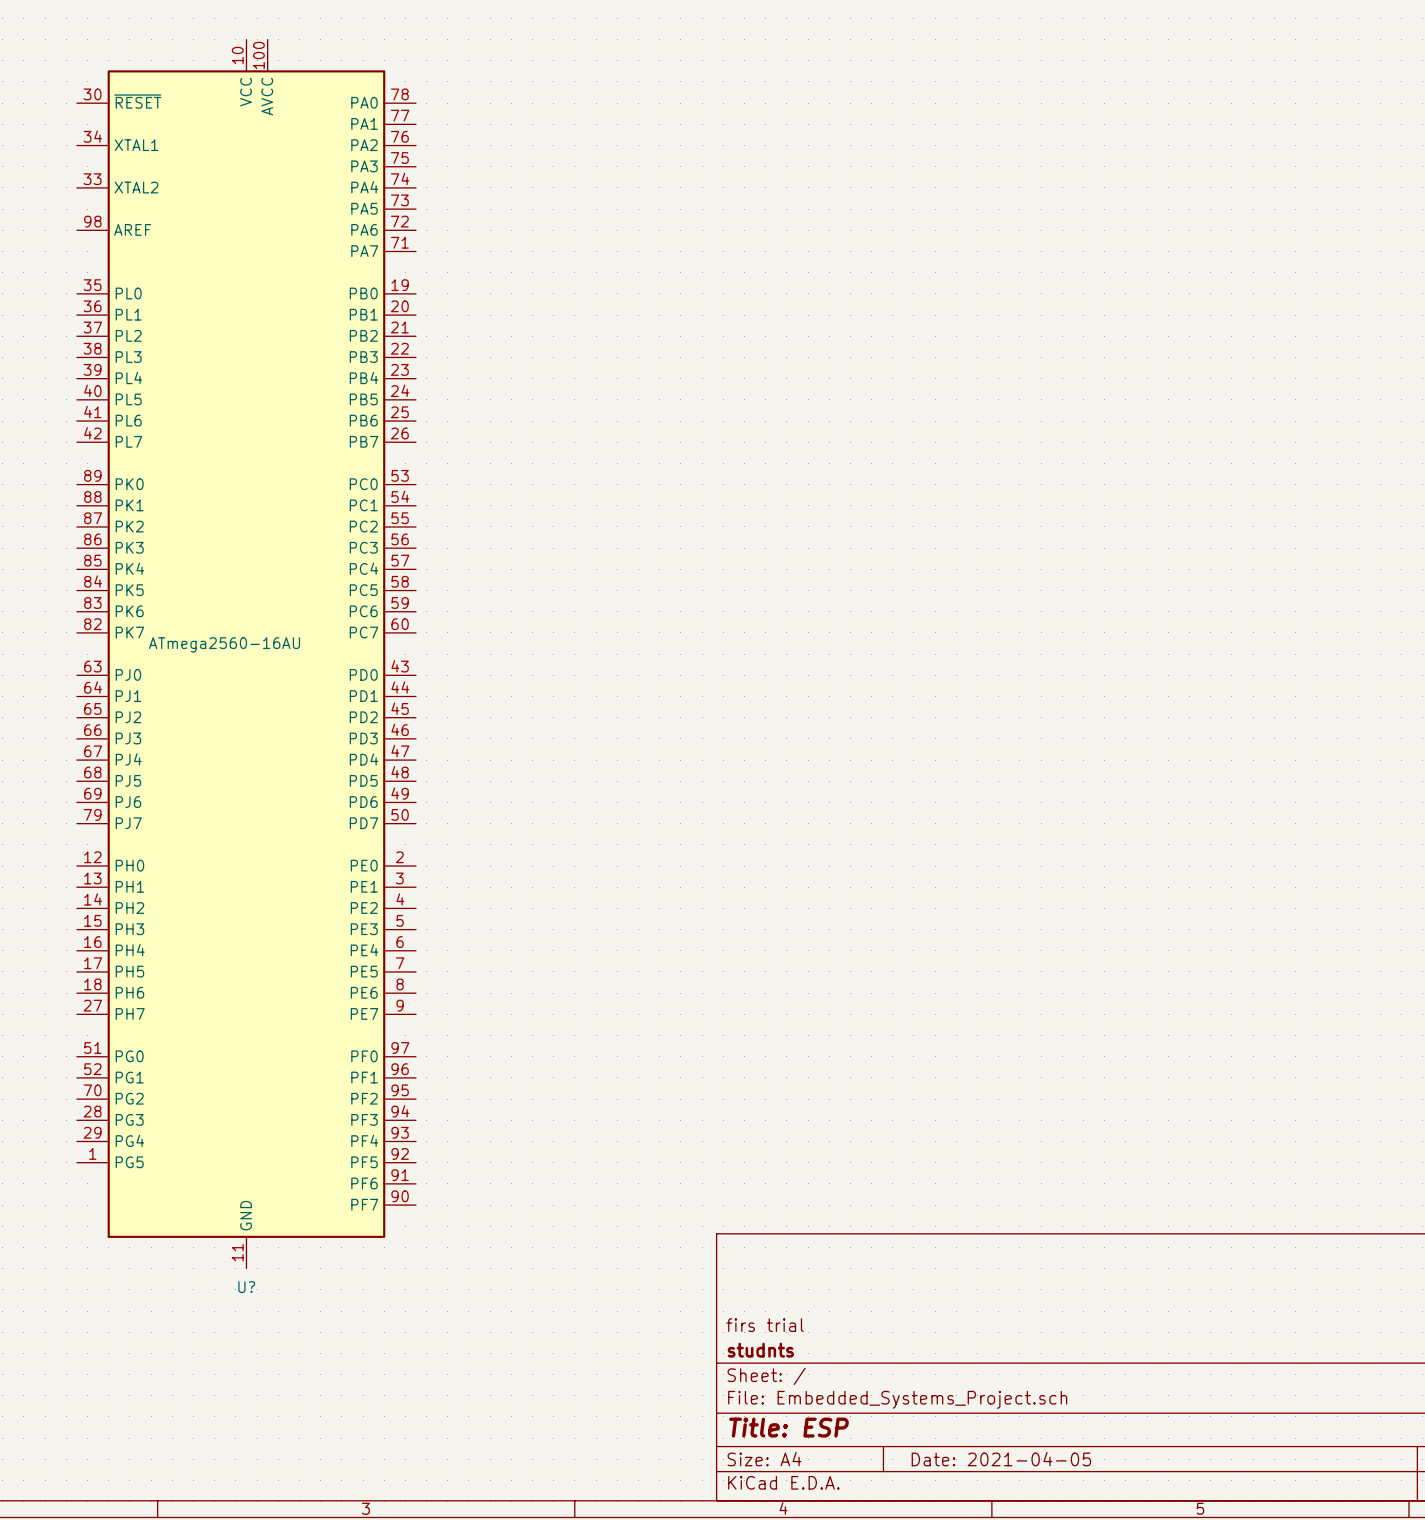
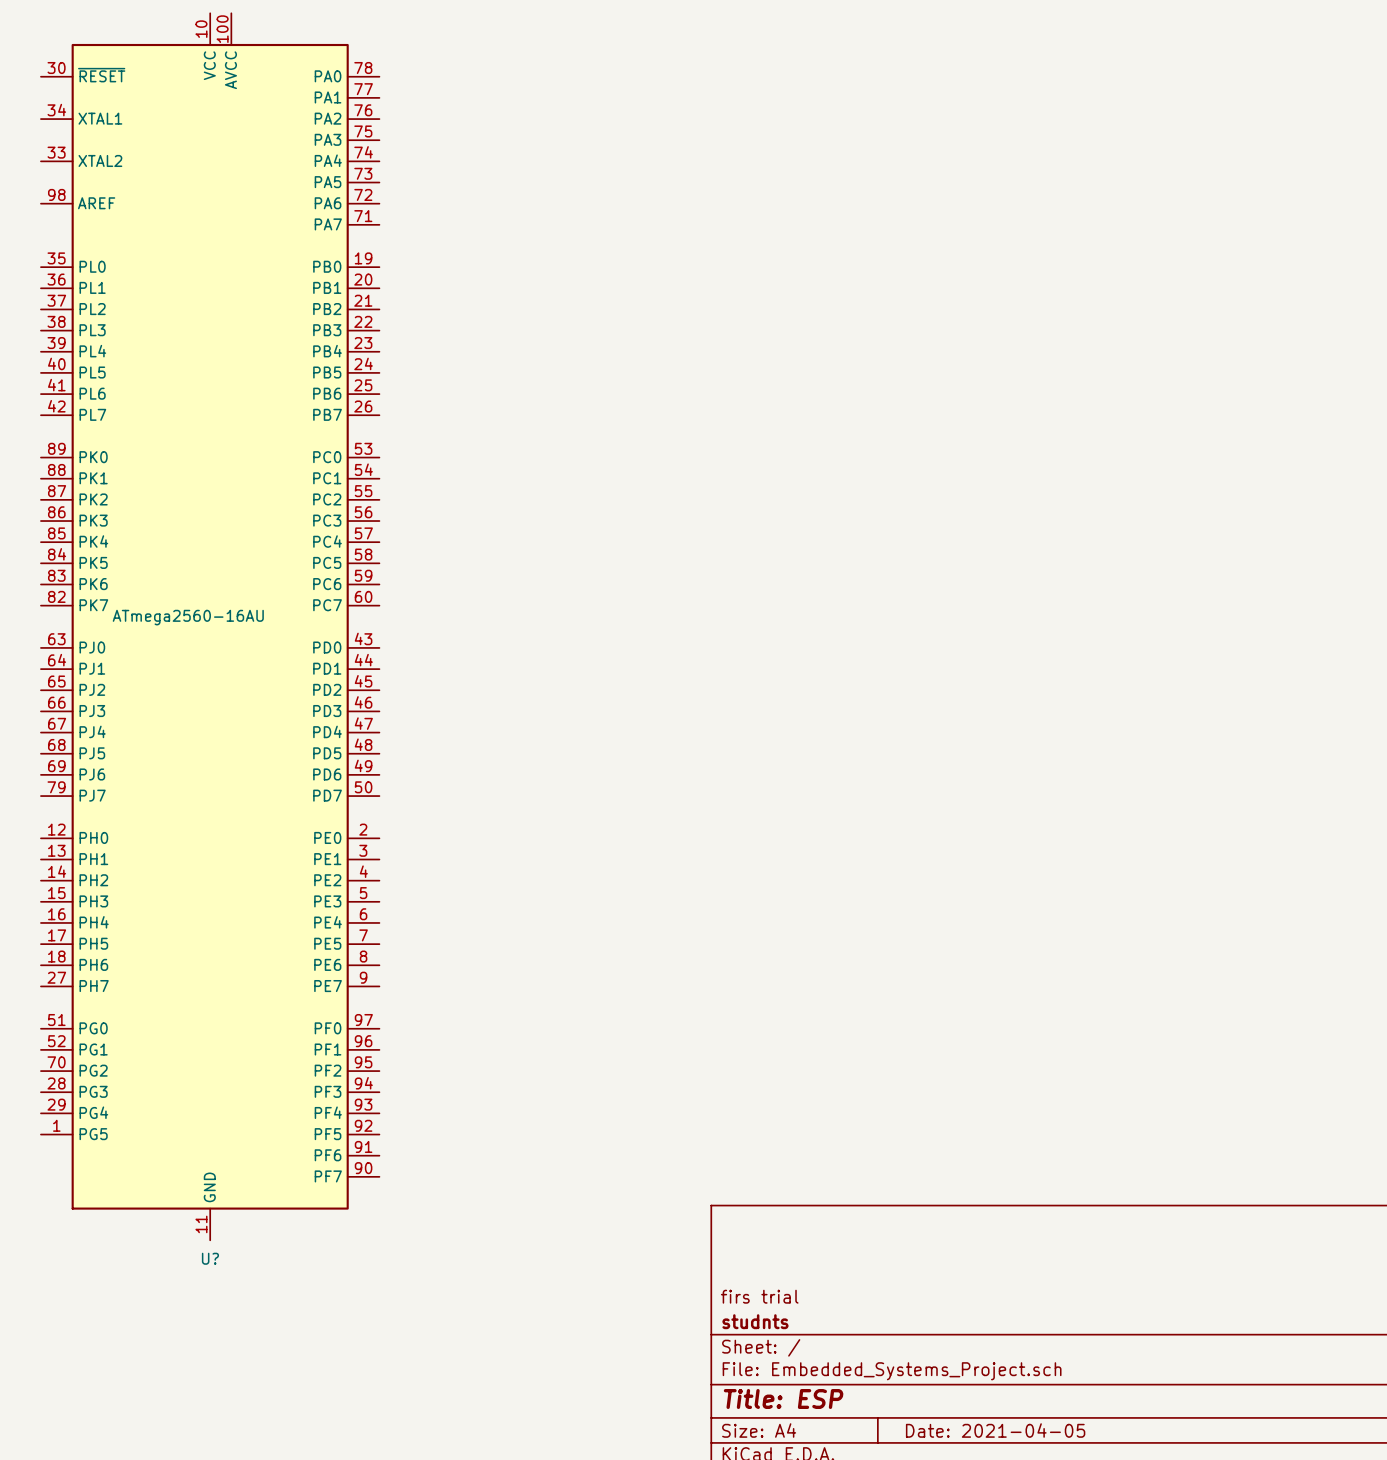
U? position: (246, 654) -> (210, 626)

